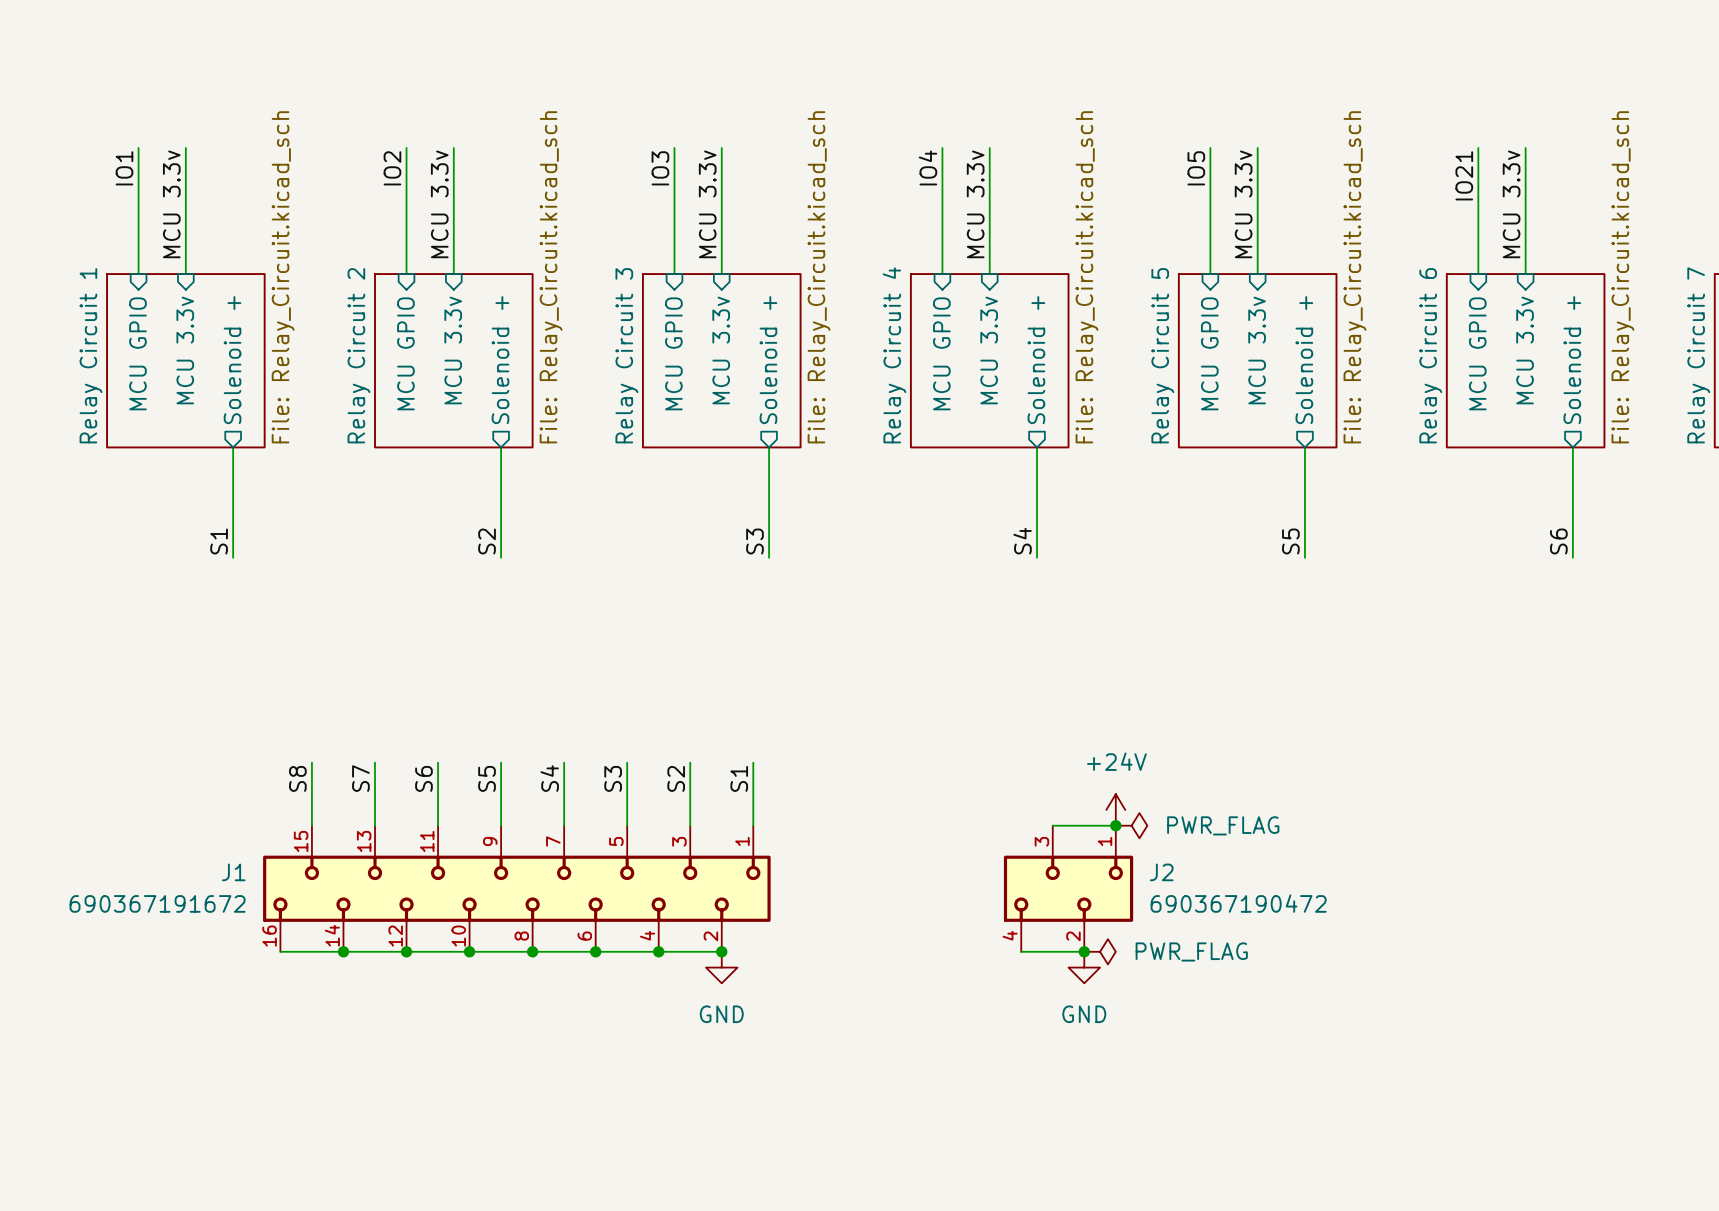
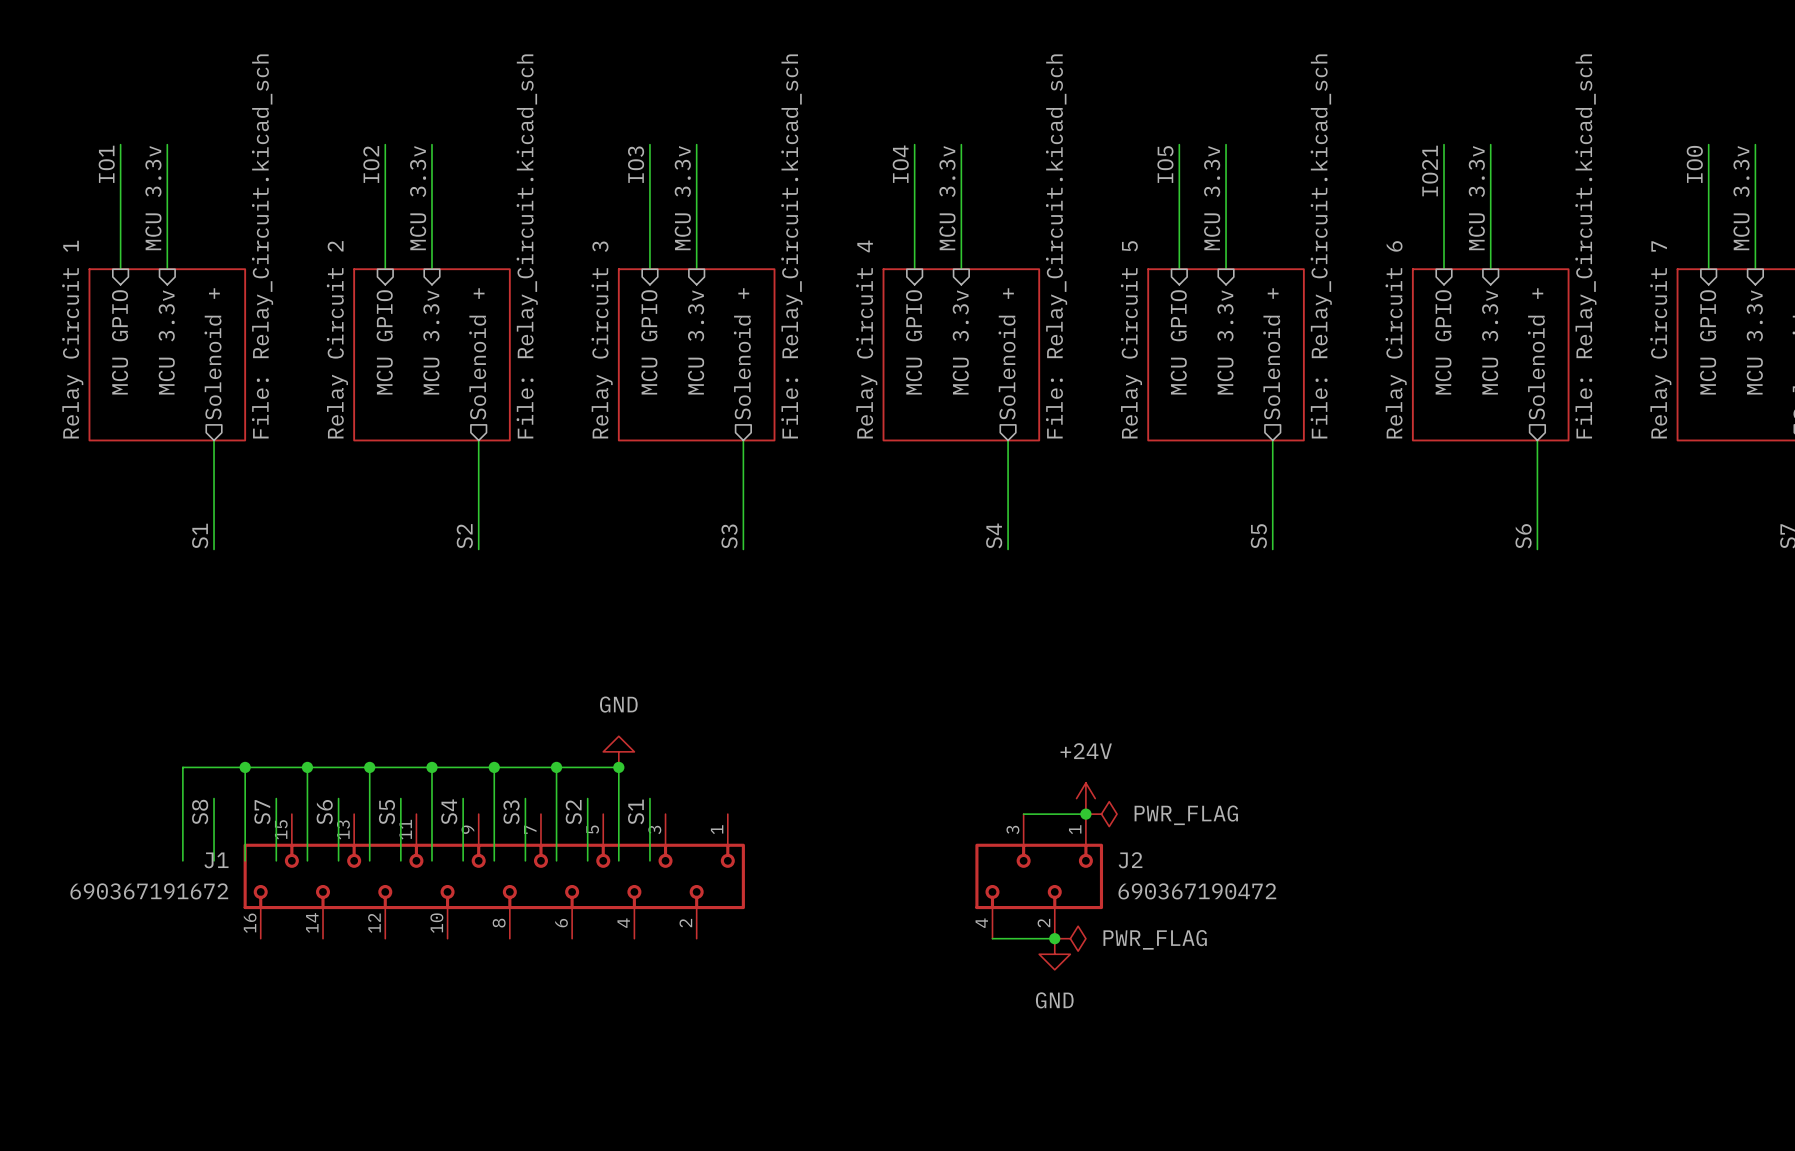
wire: (311, 762) (311, 825) -> (214, 798) (214, 860)
wire: (375, 762) (375, 825) -> (276, 798) (276, 860)
wire: (438, 762) (438, 825) -> (338, 798) (338, 860)
wire: (501, 762) (501, 825) -> (400, 798) (400, 860)
wire: (564, 762) (564, 825) -> (463, 798) (463, 860)
wire: (627, 762) (627, 825) -> (525, 798) (525, 860)
wire: (690, 762) (690, 825) -> (587, 798) (587, 860)
wire: (753, 762) (753, 825) -> (649, 798) (649, 860)
wire: none -> (245, 767) (245, 860)
junction: none -> (245, 767)
label position: S8 (297, 778) -> S8 (200, 812)
wire: none -> (307, 767) (307, 860)
junction: none -> (307, 767)
label position: S7 (360, 778) -> S7 (262, 812)
wire: none -> (369, 767) (369, 860)
junction: none -> (369, 767)
label position: S6 (423, 778) -> S6 (324, 812)
wire: none -> (431, 767) (431, 860)
junction: none -> (431, 767)
label position: S5 (487, 778) -> S5 (386, 812)
wire: none -> (494, 767) (494, 860)
junction: none -> (494, 767)
label position: S4 (549, 778) -> S4 (449, 811)
wire: none -> (556, 767) (556, 860)
junction: none -> (556, 767)
label position: S3 (613, 778) -> S3 (511, 812)
junction: none -> (618, 767)
label position: S2 (676, 778) -> S2 (573, 812)
label position: S1 (739, 778) -> S1 (636, 811)
wire: none -> (182, 860) (182, 767) (618, 767) (618, 860)
wire: (280, 951) (721, 951) -> none
junction: (343, 951) -> none
junction: (406, 951) -> none
junction: (469, 951) -> none
junction: (532, 951) -> none
junction: (595, 951) -> none
junction: (658, 951) -> none
junction: (721, 951) -> none
power symbol rotation: 0° (721, 967) -> 180° (618, 751)
power symbol position: GND (721, 967) -> GND (618, 751)

